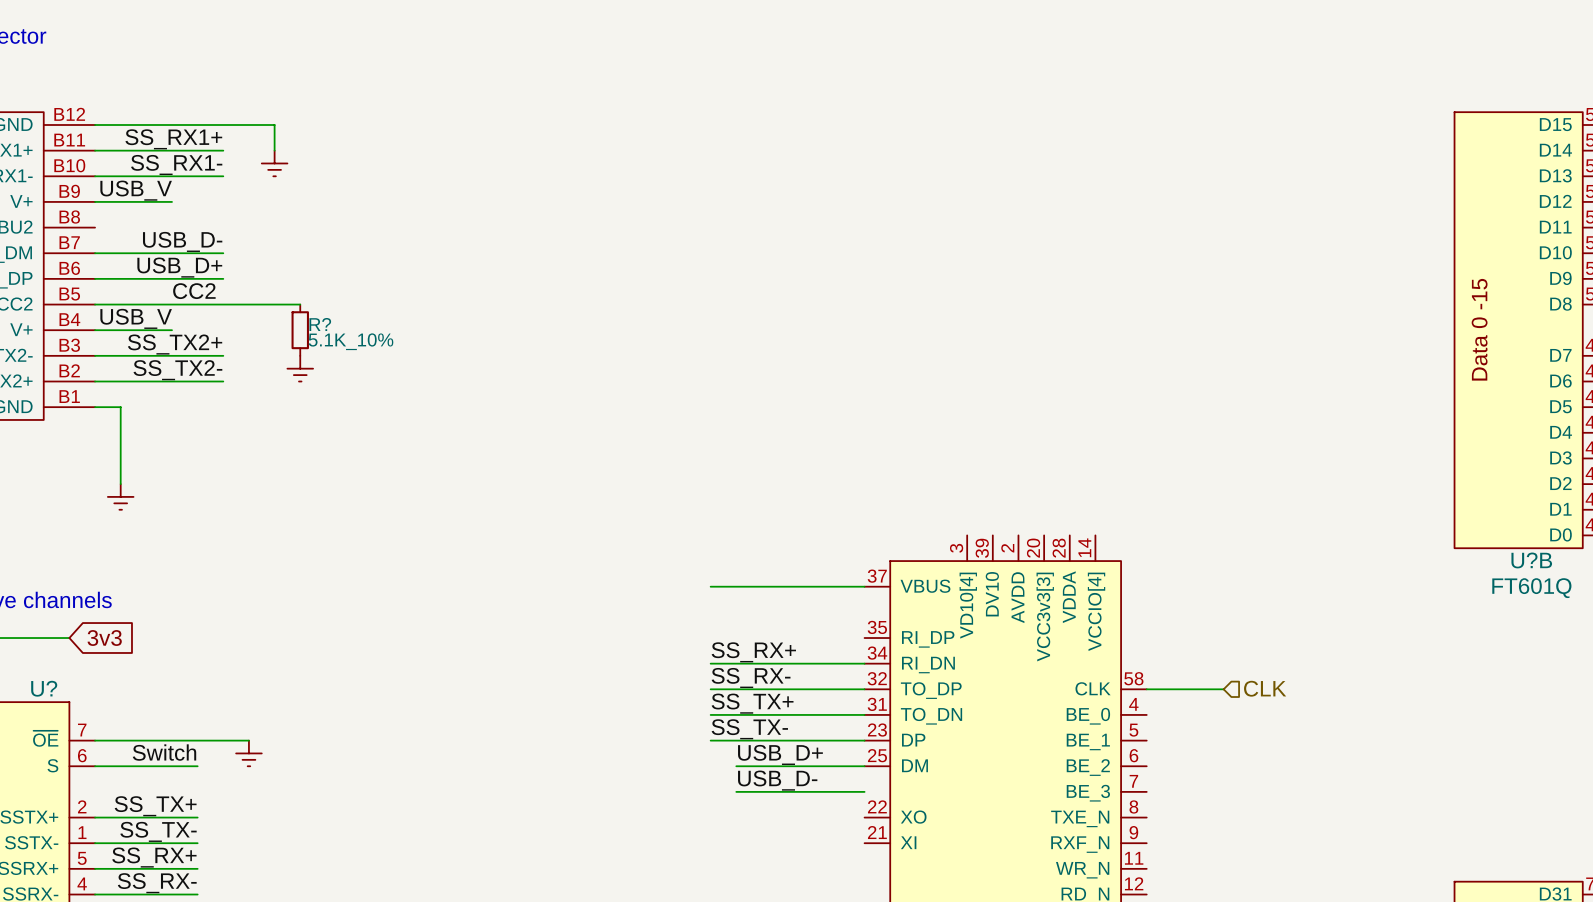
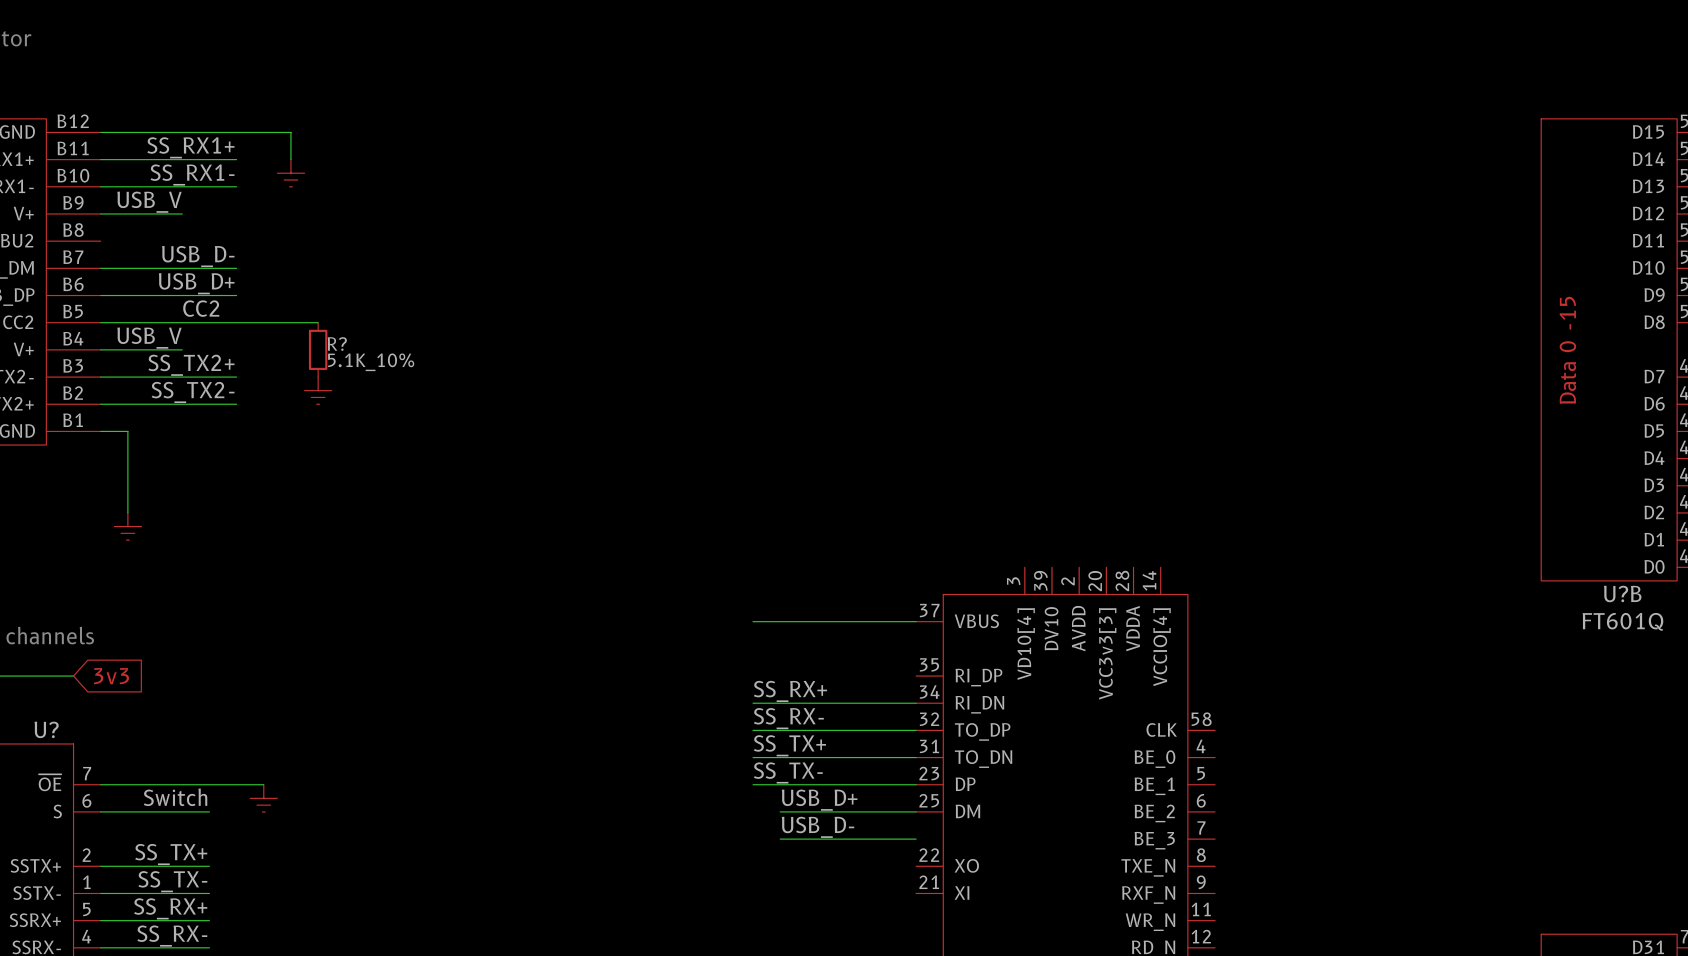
hierarchical label: CLK (1265, 688) -> none
wire: (1146, 689) (1223, 689) -> none

